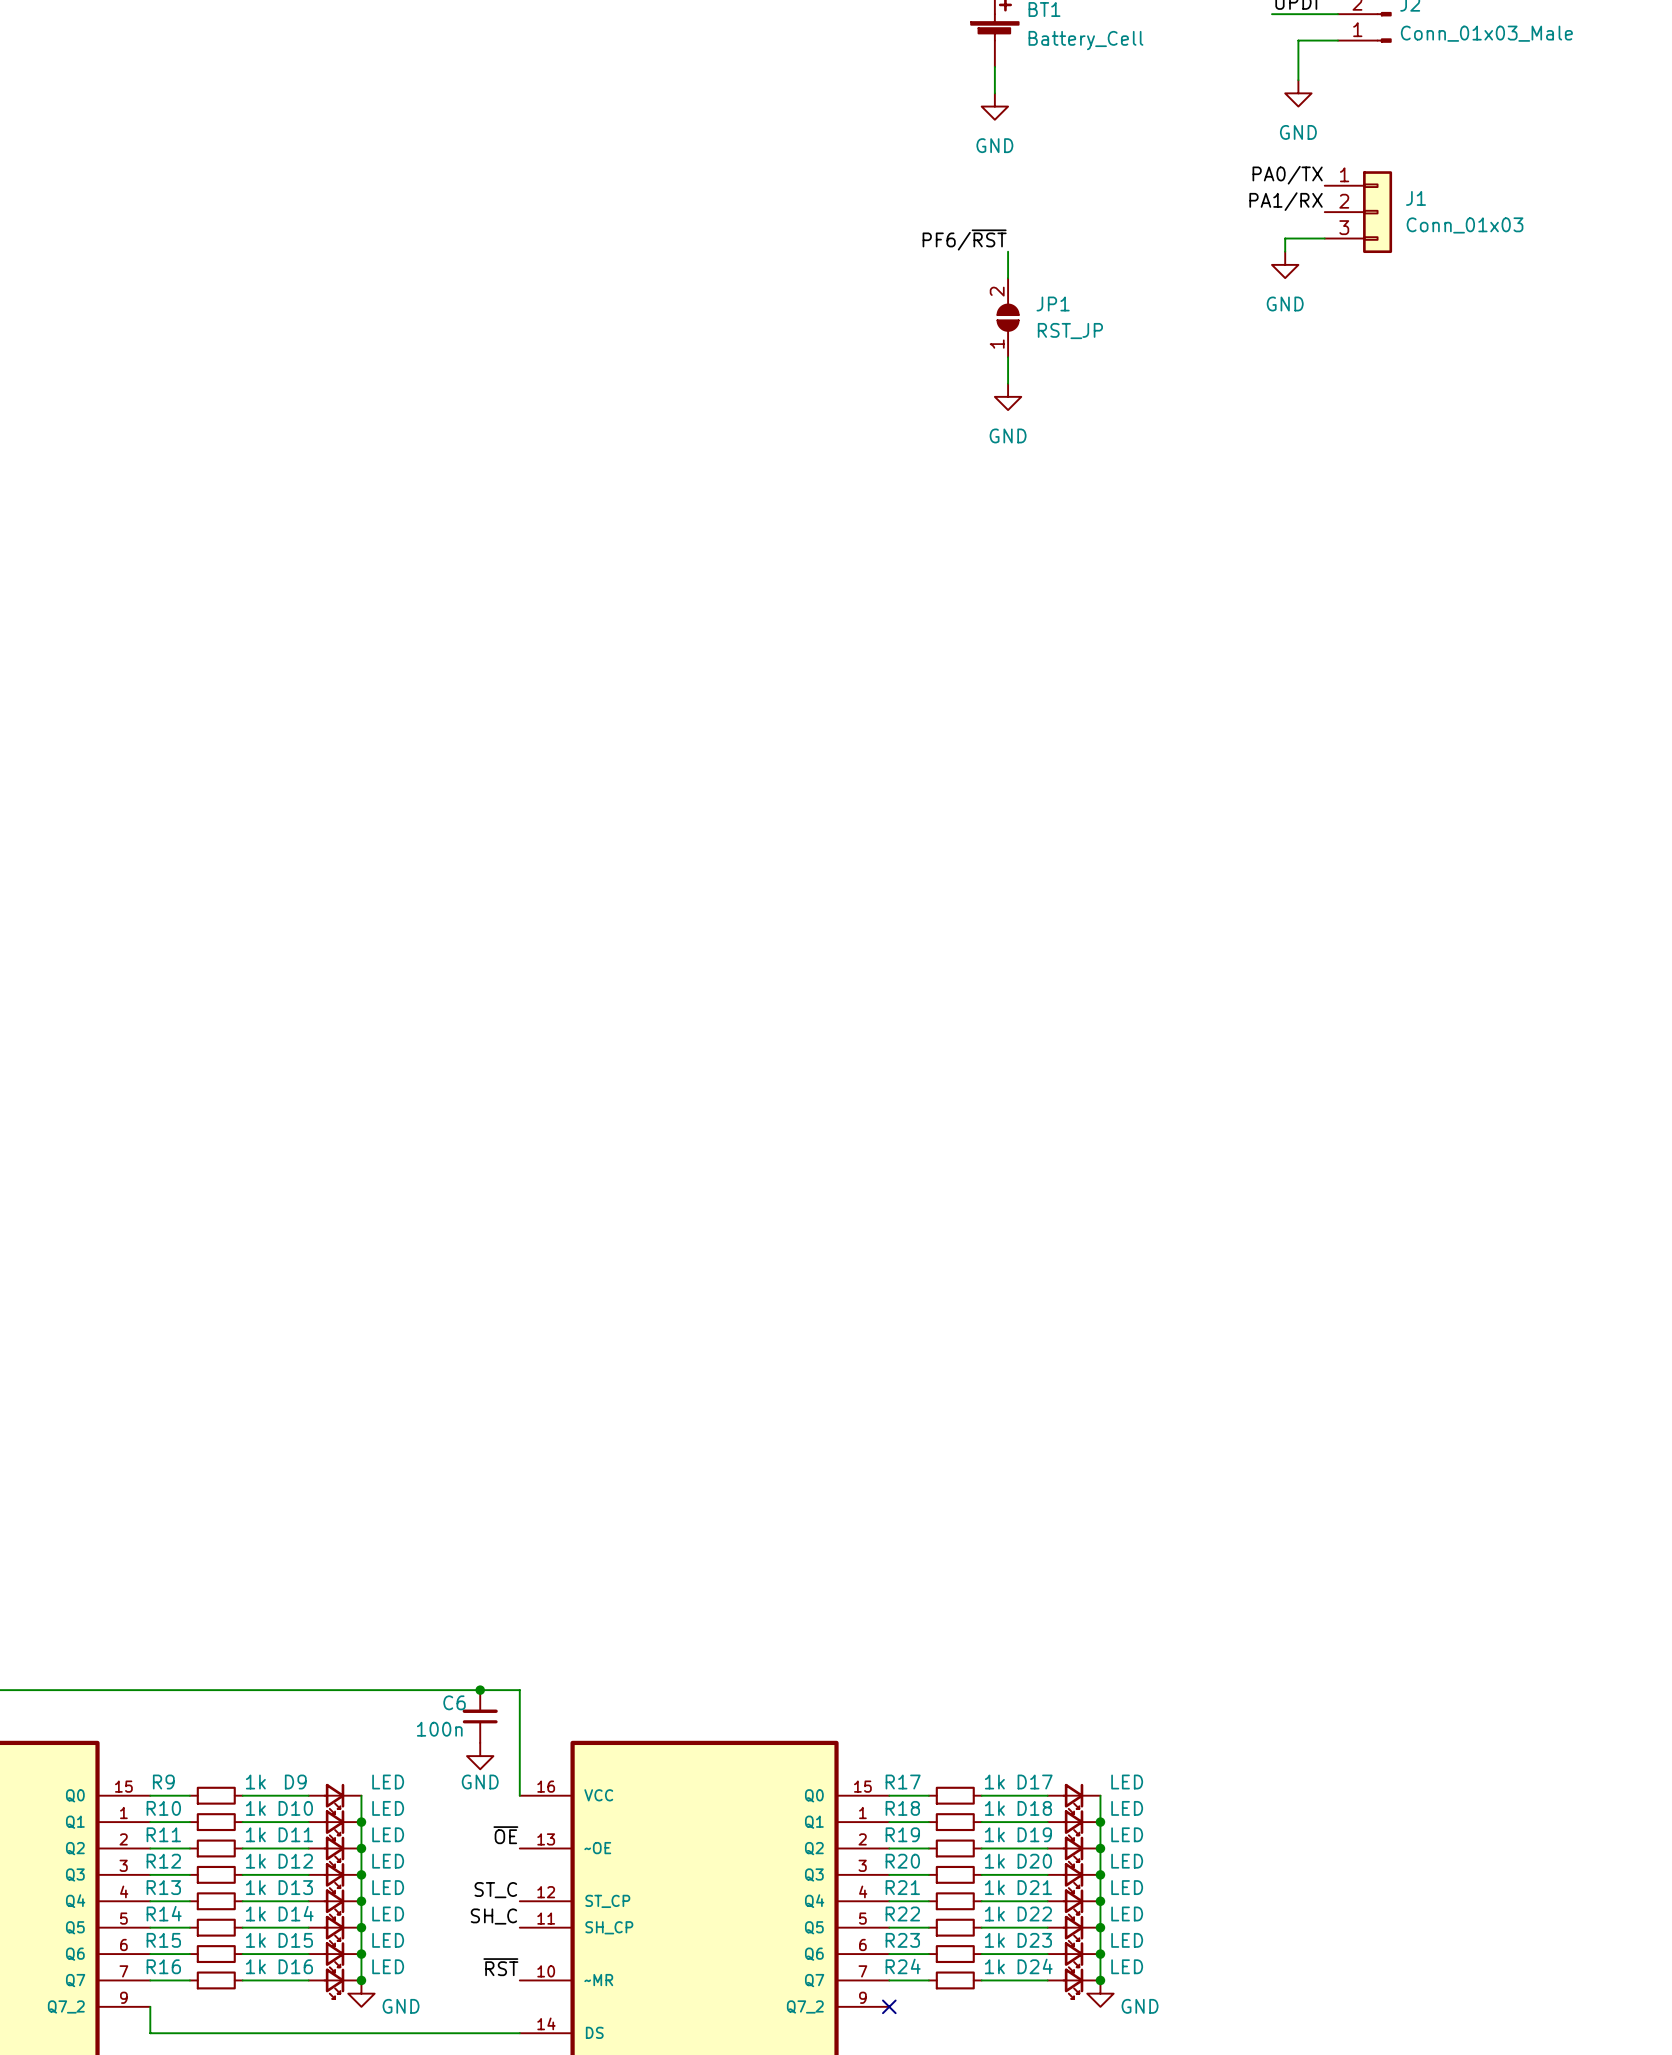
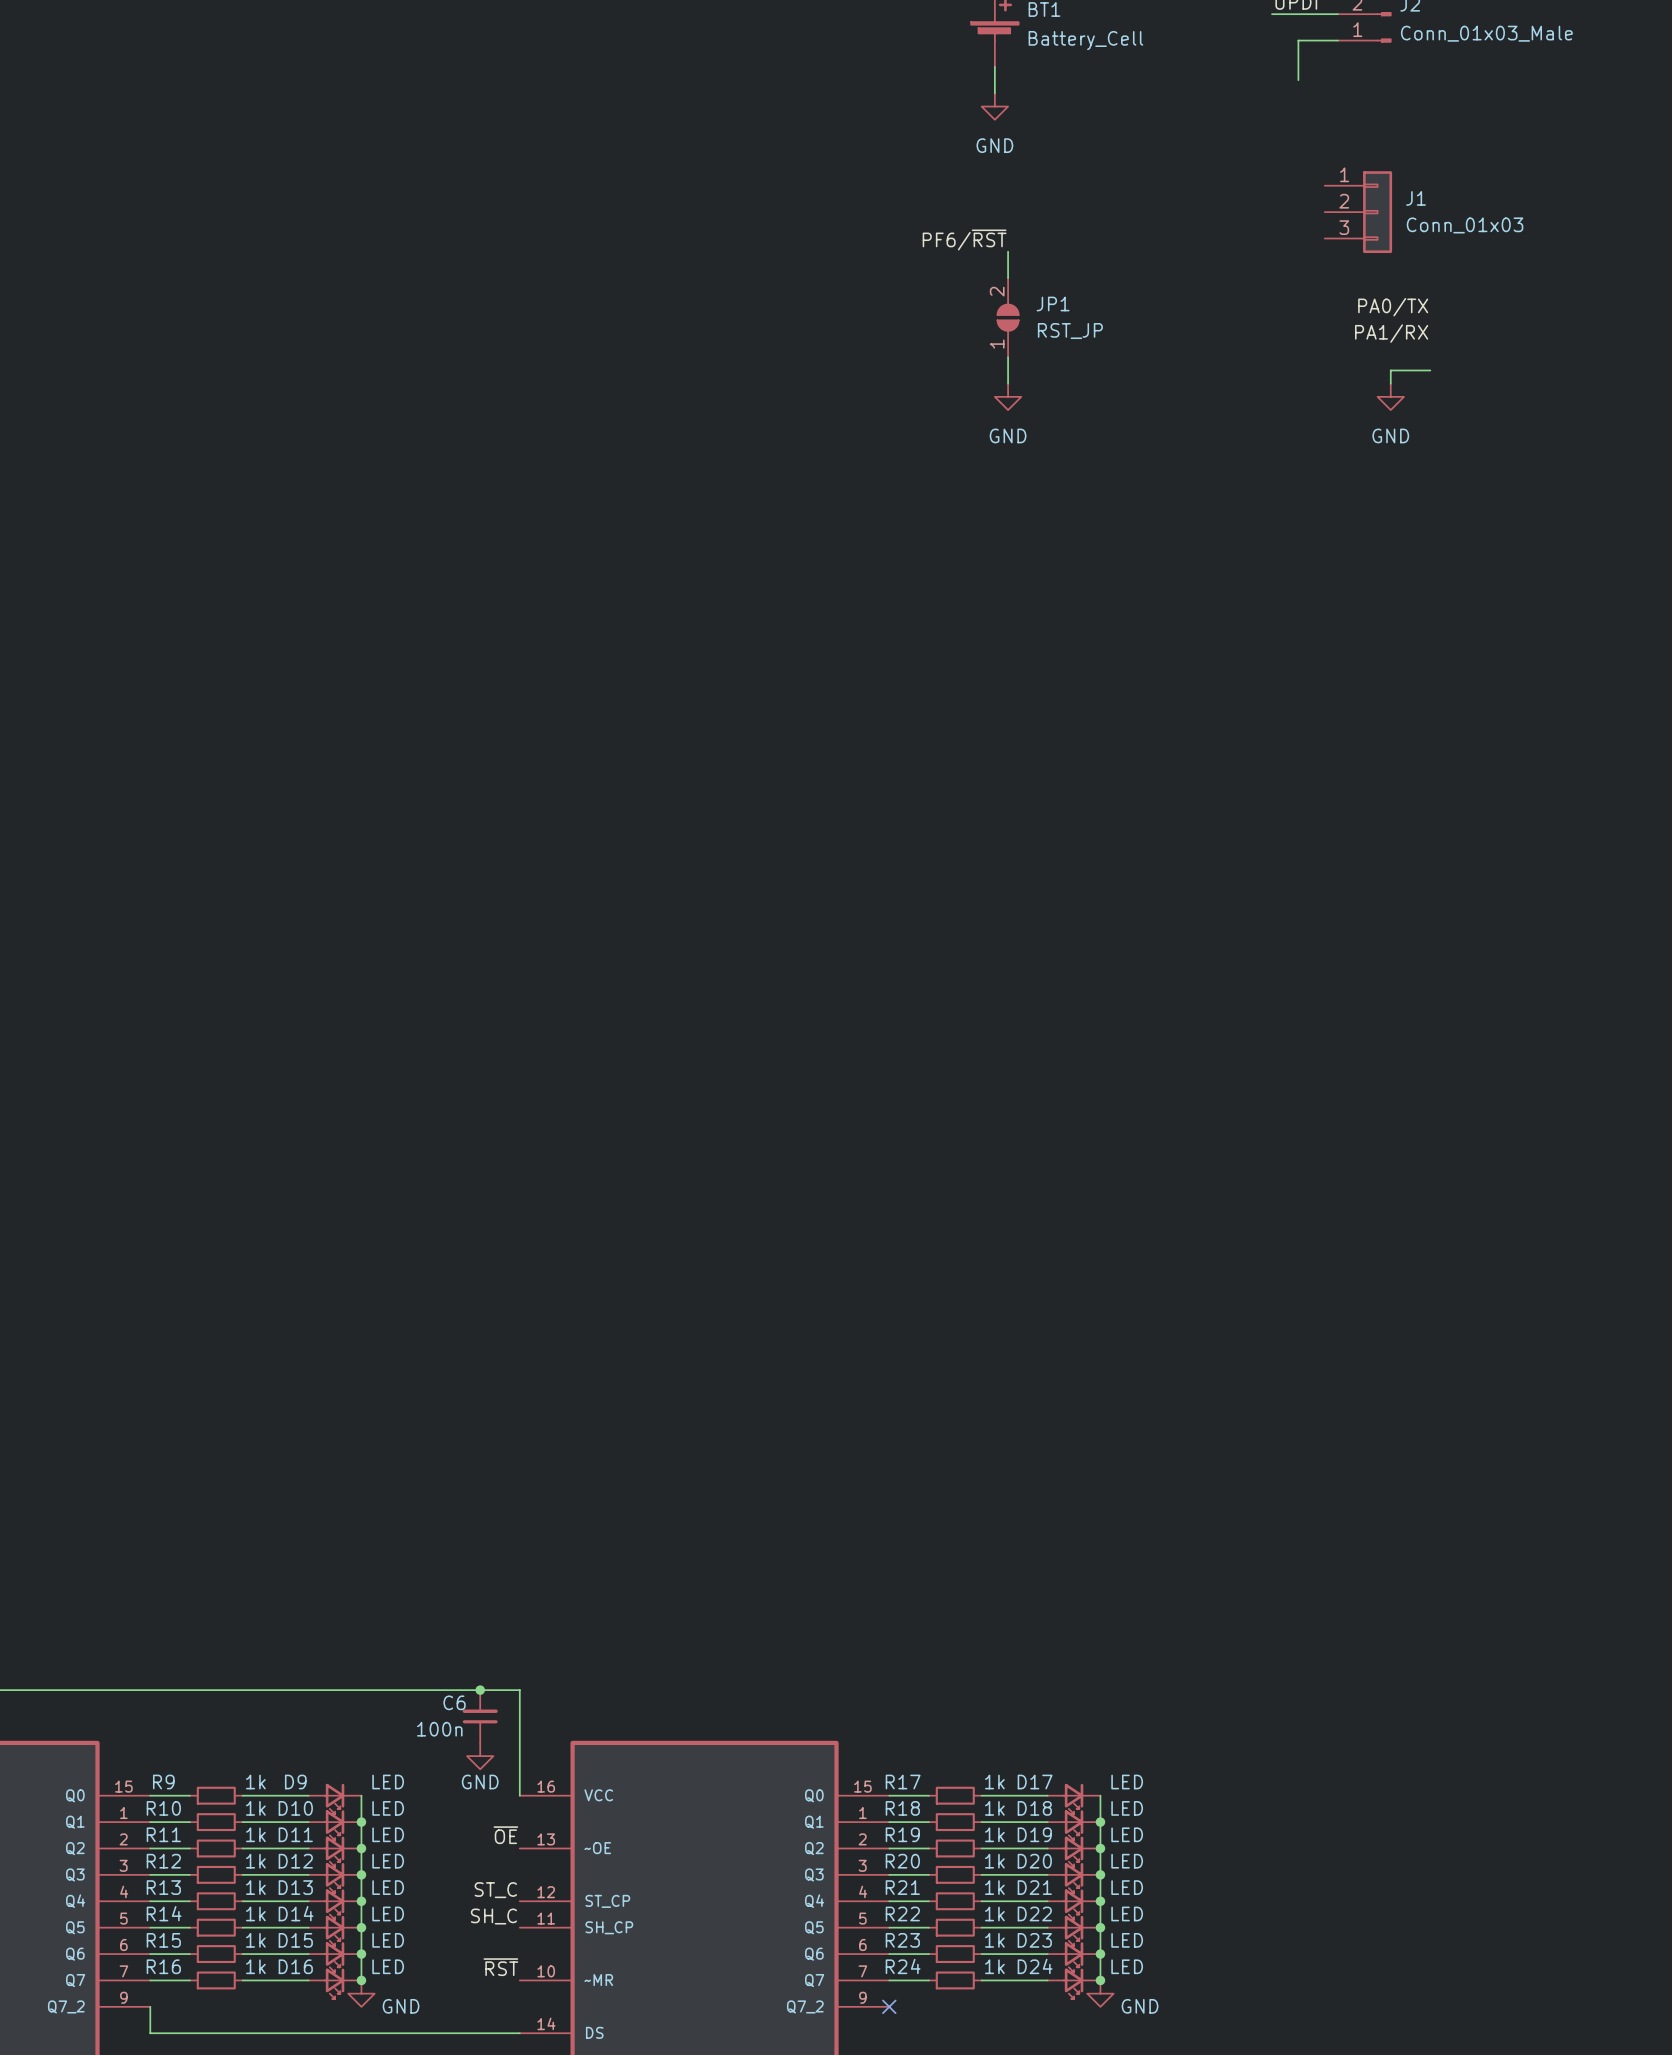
power symbol: GND (1298, 93) -> none
label position: PA0/TX (1287, 175) -> PA0/TX (1393, 307)
label position: PA1/RX (1286, 201) -> PA1/RX (1391, 333)
wire: (1324, 238) (1285, 238) (1285, 251) -> (1430, 370) (1390, 370) (1390, 383)
power symbol: GND (1285, 264) -> none
power symbol: none -> GND (1390, 396)

